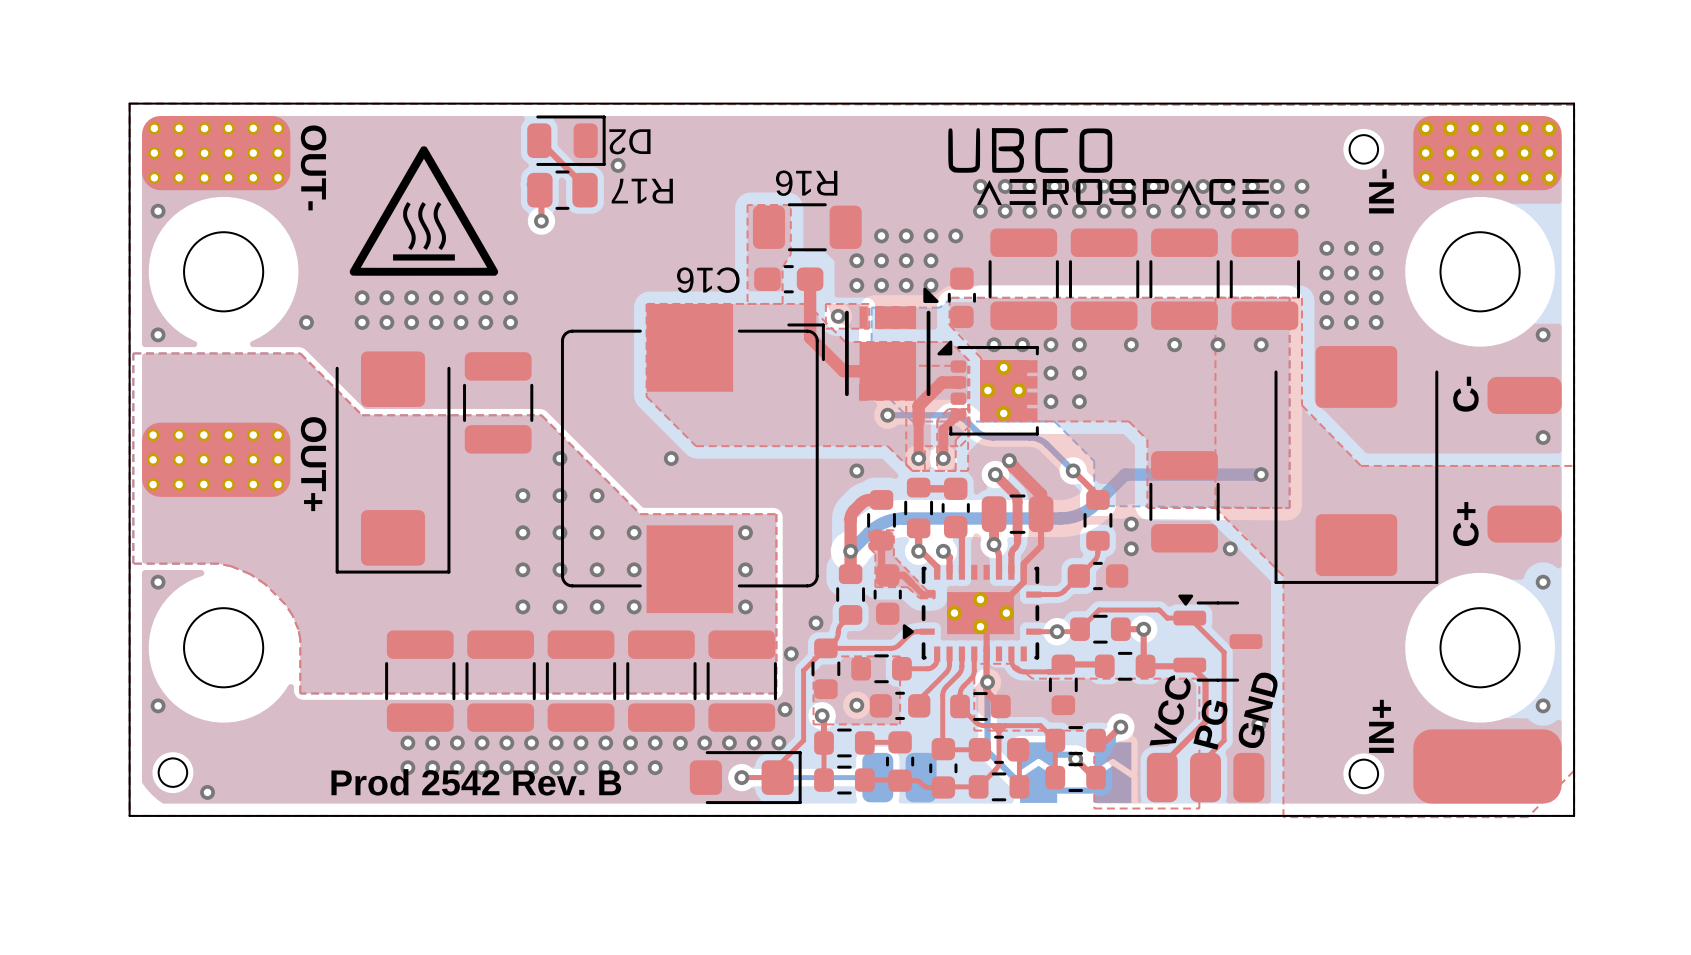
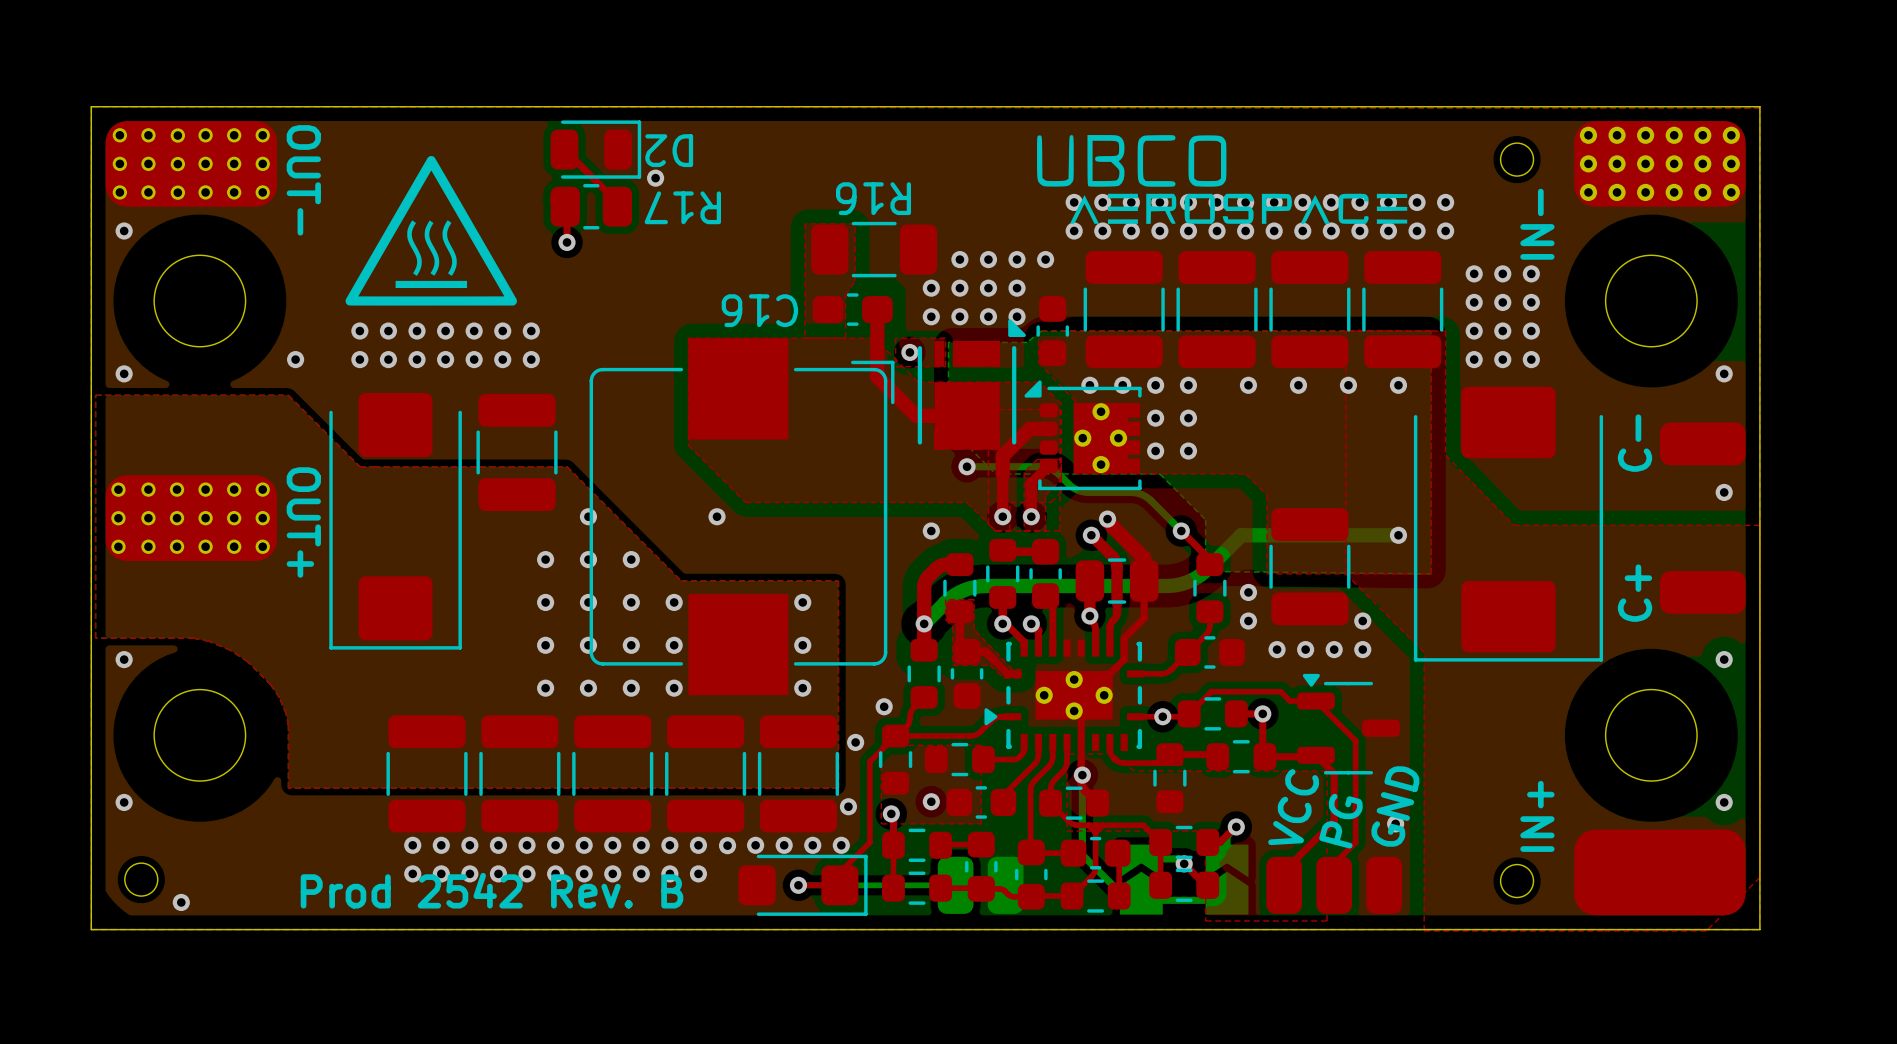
via: none -> (1277, 649)
via: none -> (1305, 649)
via: none -> (1334, 649)
via: none -> (1362, 649)

